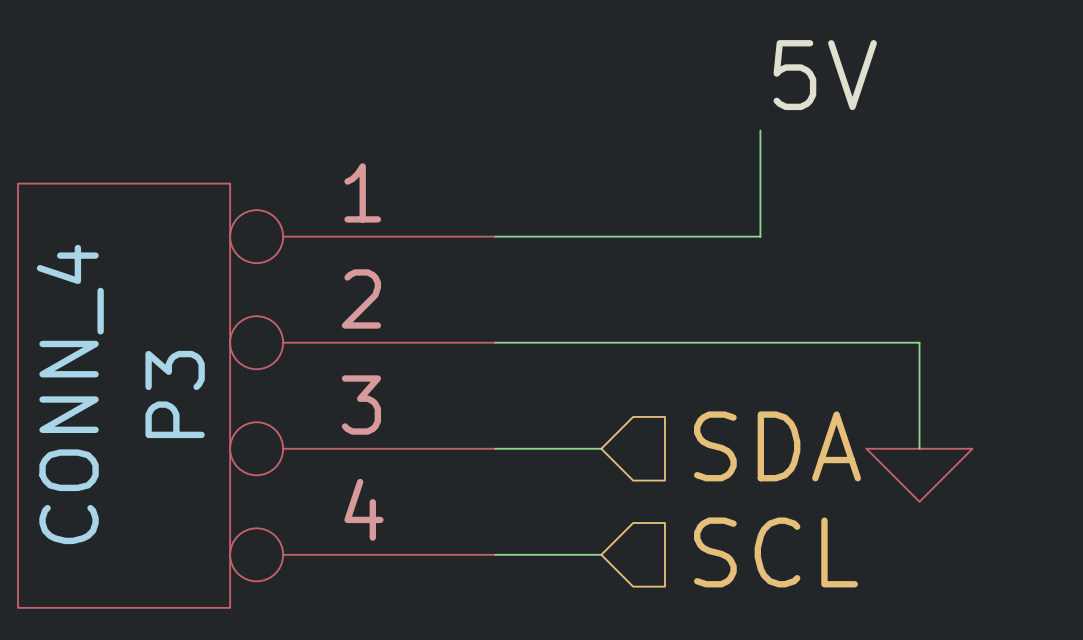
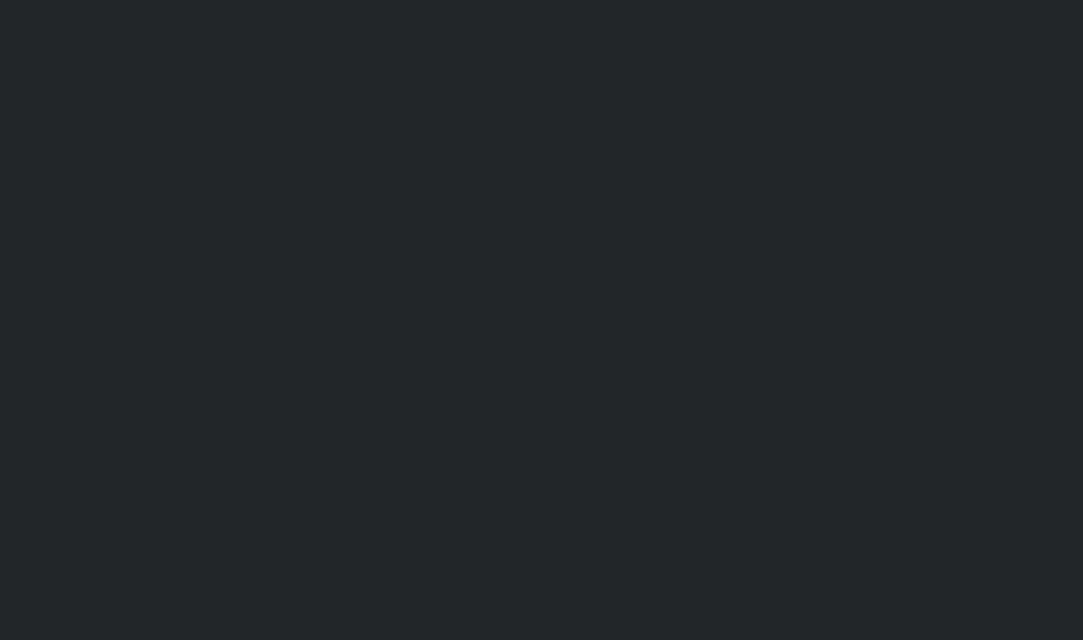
label: 5V (825, 75) -> none
wire: (760, 130) (760, 236) (495, 236) -> none
wire: (495, 342) (919, 342) (919, 448) -> none
P3: CONN_4 (256, 395) -> none
hierarchical label: SDA (777, 446) -> none
wire: (495, 448) (601, 448) -> none
power symbol: (919, 475) -> none
hierarchical label: SCL (775, 552) -> none
wire: (495, 554) (601, 554) -> none

